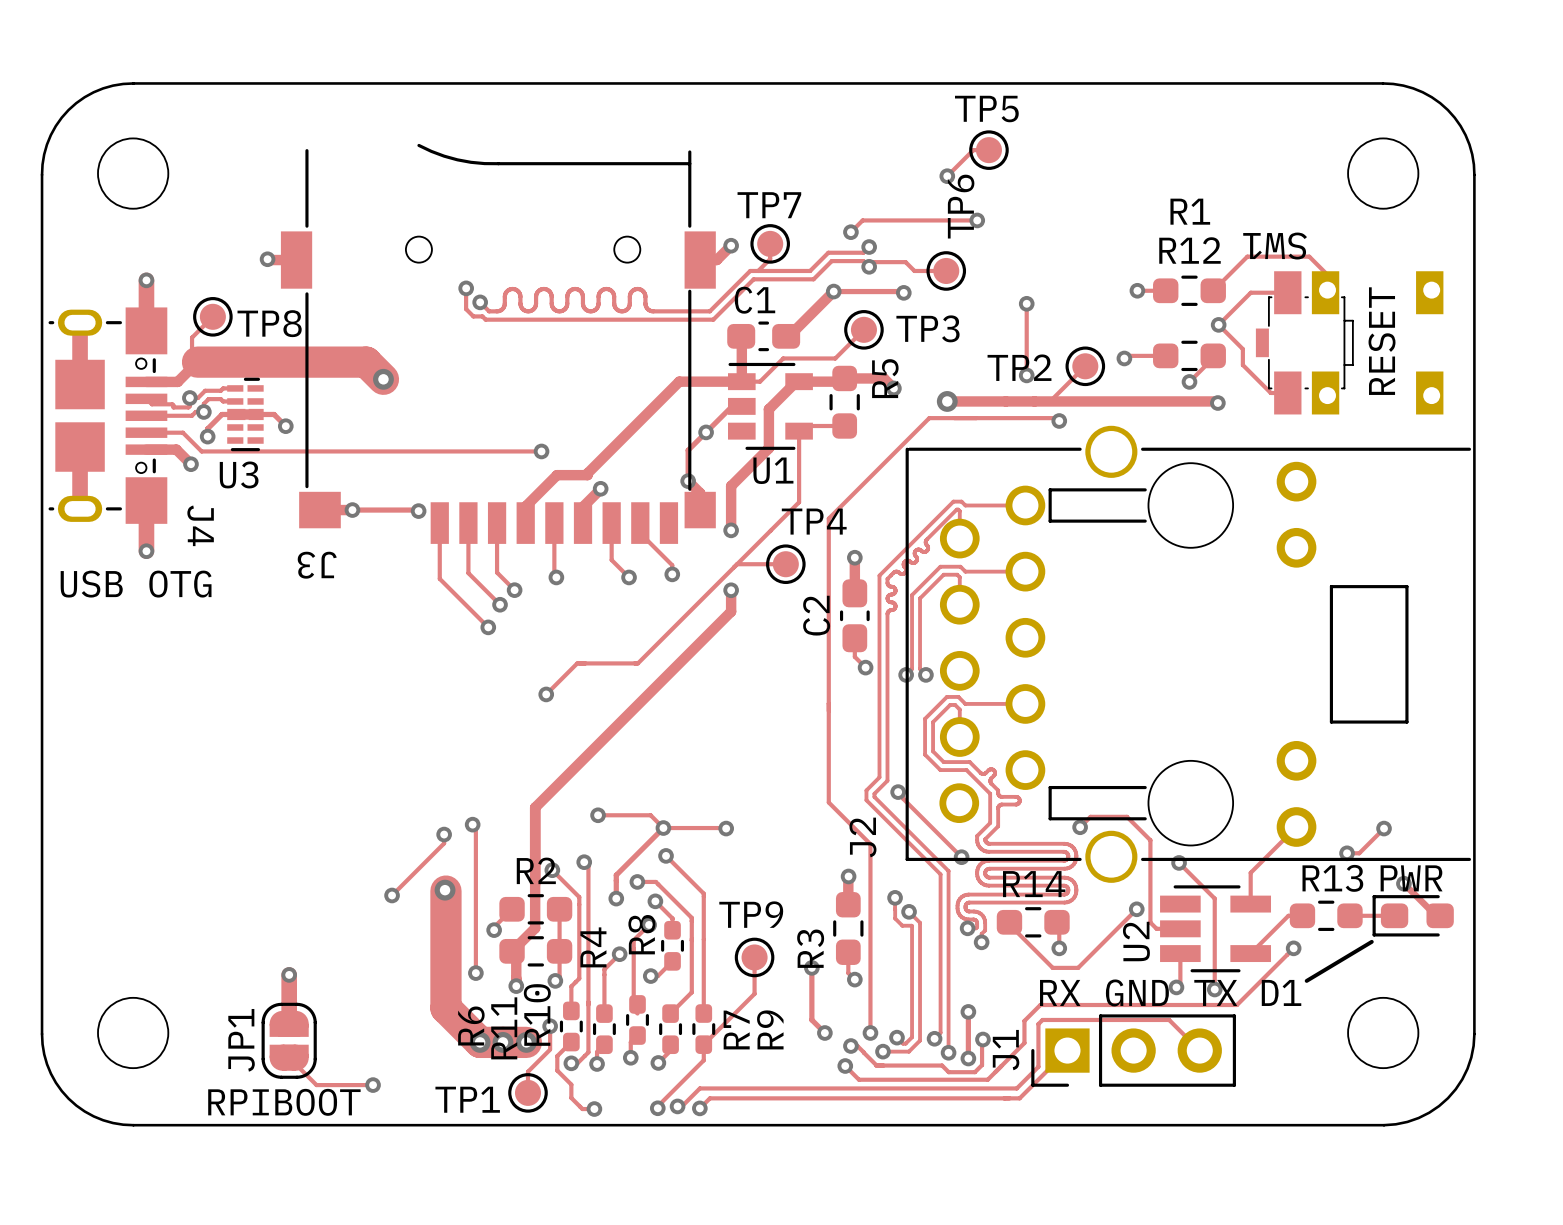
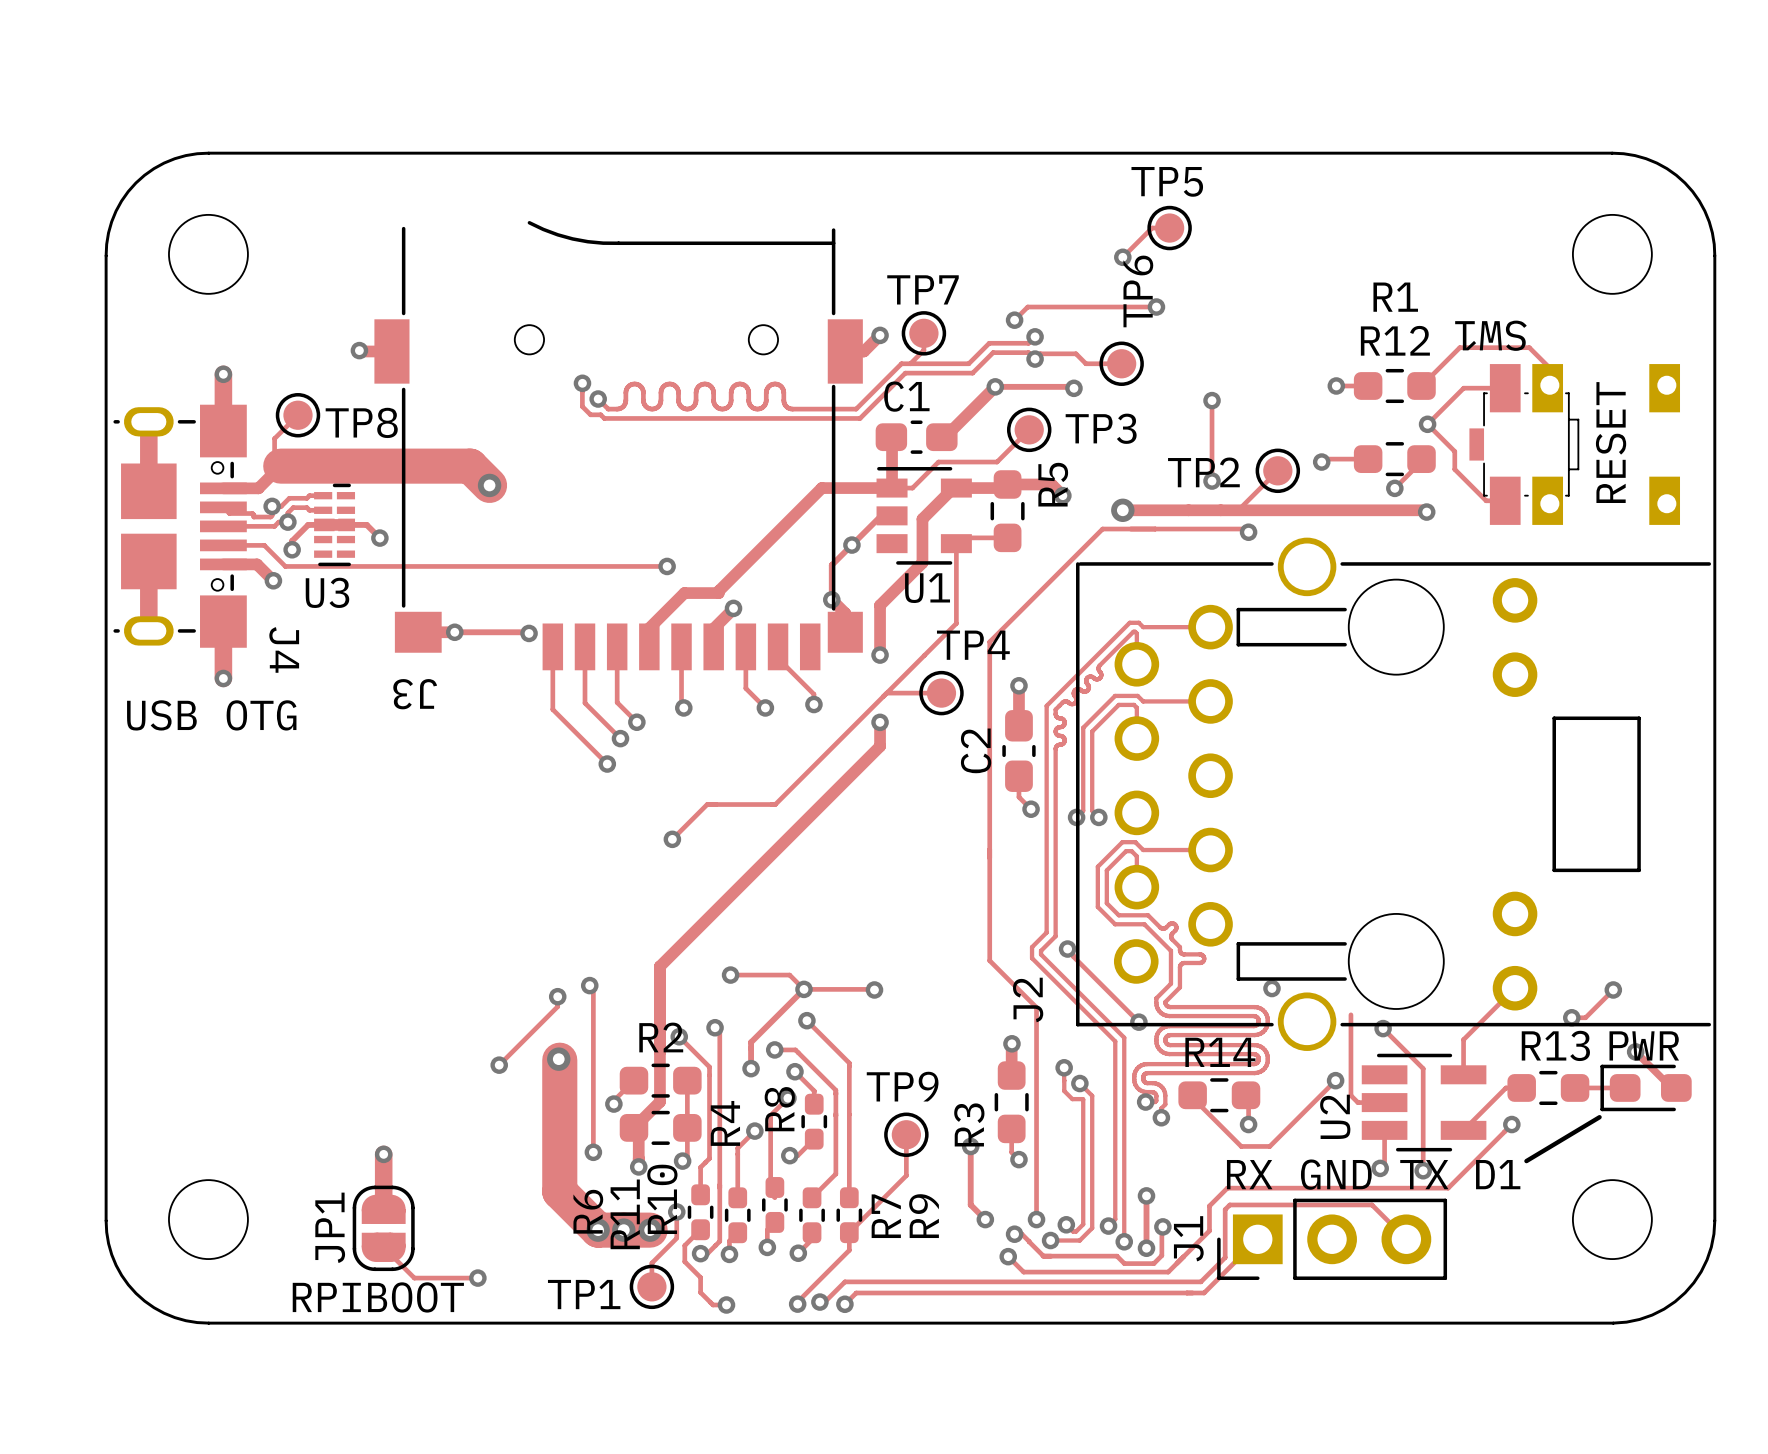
track: (1080, 827) (1090, 816) (1126, 816) (1150, 840) (1150, 850) -> none

